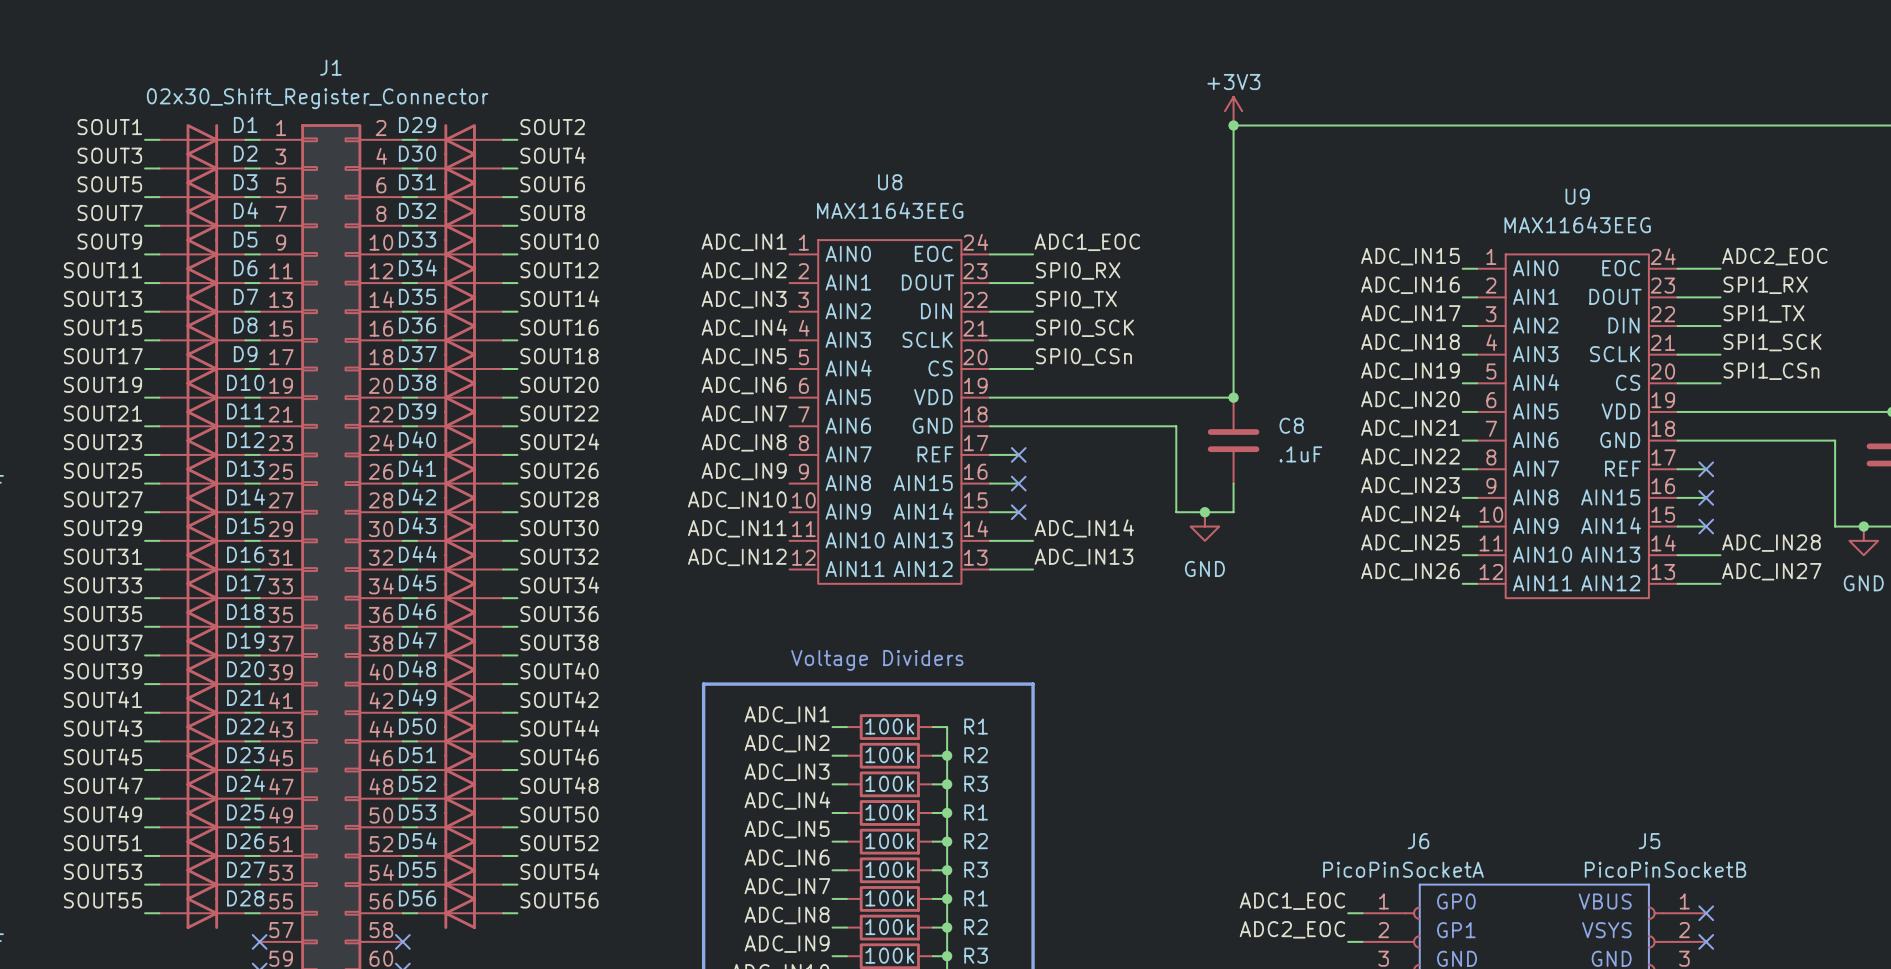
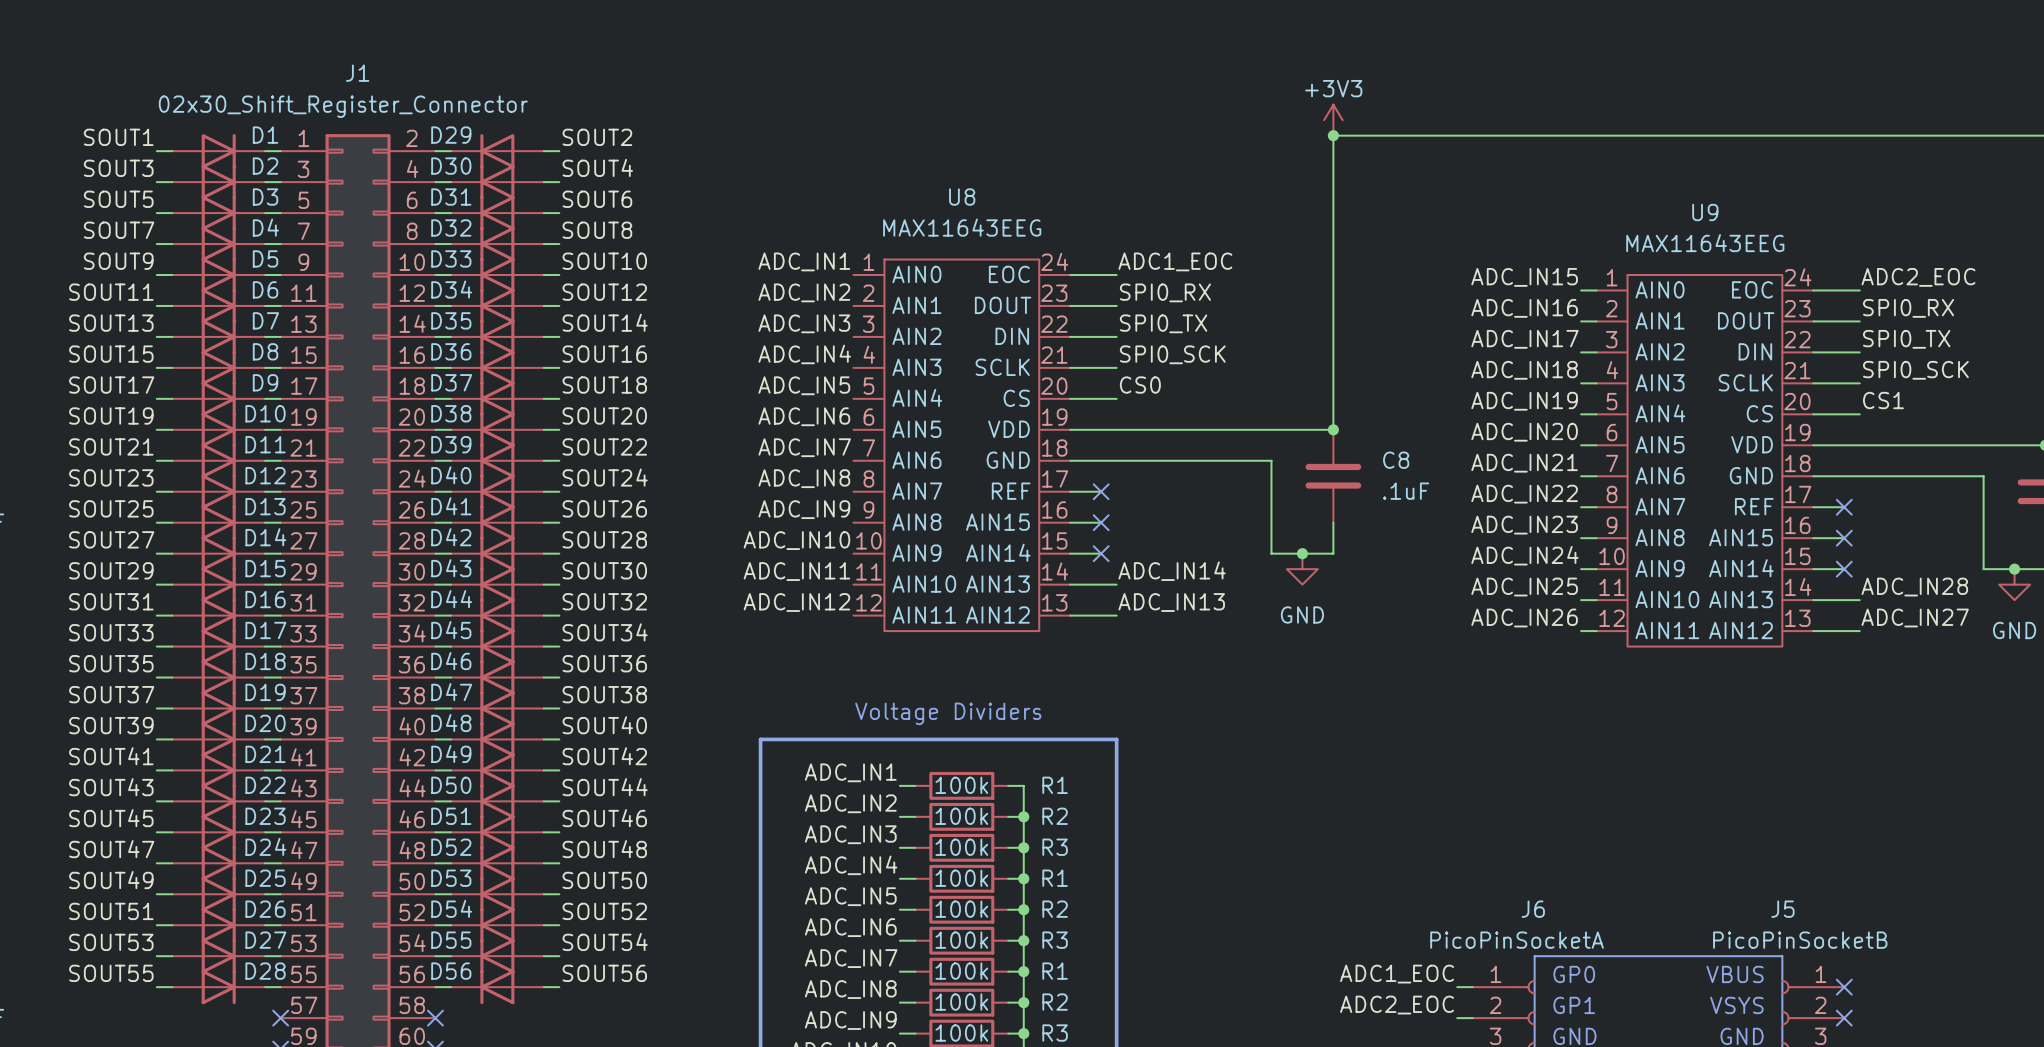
label: SPI1_RX (1765, 285) -> SPI0_RX (1908, 308)
label: SPI1_TX (1763, 313) -> SPI0_TX (1906, 339)
label: SPI1_SCK (1772, 342) -> SPI0_SCK (1915, 370)
label: SPI0_CSn (1083, 356) -> CS0 (1140, 385)
label: SPI1_CSn (1771, 371) -> CS1 (1883, 400)

